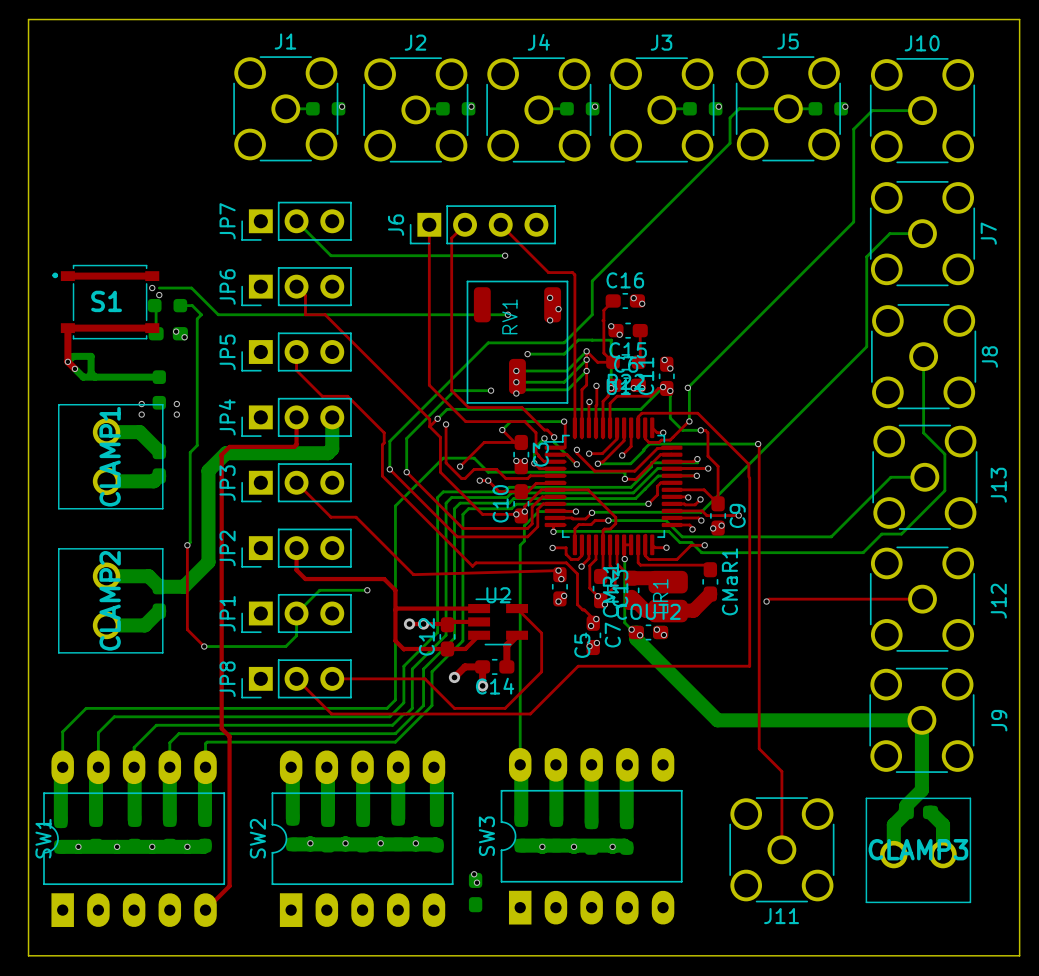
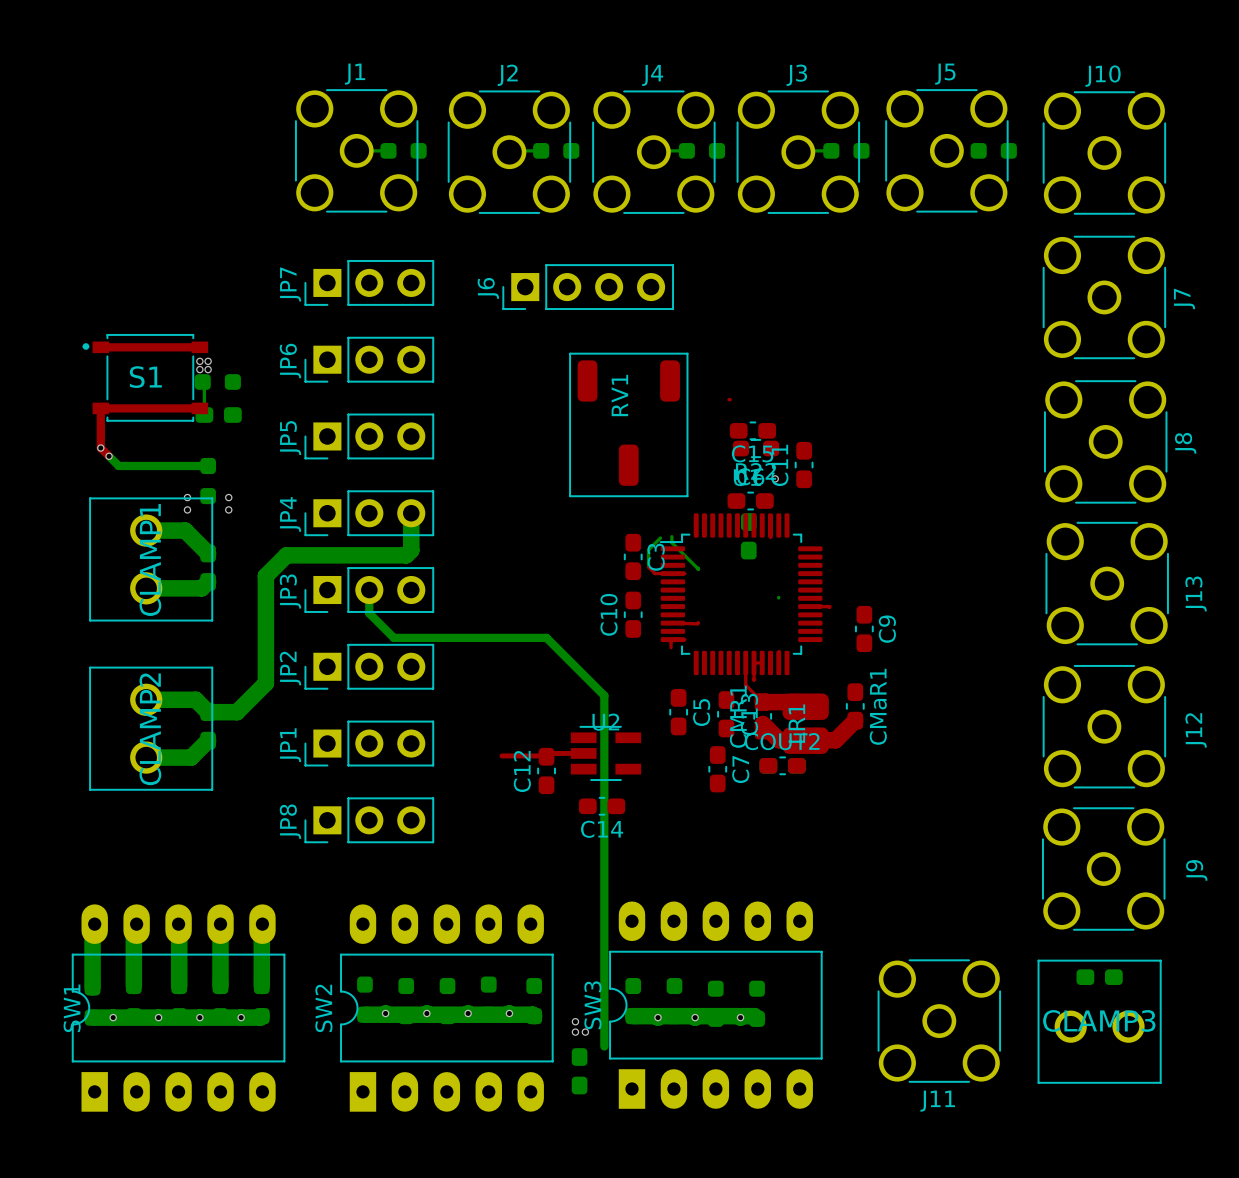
board edge: (28, 19) (1019, 19) (1019, 955) (28, 955) (28, 19) -> none
via: (342, 106) -> none
via: (471, 106) -> none
via: (595, 106) -> none
via: (718, 106) -> none
via: (845, 106) -> none
bottom track: (815, 108) (739, 108) (730, 117) (730, 143) (592, 281) (592, 314) (564, 342) (488, 342) (389, 441) (389, 469) -> none
bottom track: (922, 110) (872, 110) (853, 129) (853, 221) (687, 387) (689, 421) -> none
bottom track: (296, 221) (330, 255) (505, 255) -> none
top track: (429, 224) (429, 385) (465, 421) (524, 421) (536, 432) (536, 452) (544, 461) (565, 461) -> none
top track: (465, 224) (451, 238) (451, 390) (468, 407) (521, 407) (554, 436) -> none
top track: (500, 224) (548, 272) (572, 272) (574, 274) (574, 438) -> none
bottom track: (922, 233) (889, 233) (866, 256) (866, 346) (701, 512) (591, 512) -> none
via: (505, 255) -> none
top track: (296, 286) (305, 295) (305, 314) (325, 314) (429, 419) (429, 426) -> none
bottom track: (159, 288) (191, 288) (218, 314) (507, 314) -> none
via: none -> (208, 361)
via: none -> (199, 369)
via: (550, 297) -> none
via: (633, 298) -> none
top track: (613, 300) (603, 310) (603, 353) (613, 362) (597, 362) (586, 351) (586, 385) (581, 389) (581, 438) -> none
C16 side: top (625, 300) -> bottom (748, 536)
via: (642, 303) -> none
bottom track: (180, 305) (192, 305) (201, 314) (197, 318) (197, 445) (190, 452) (190, 542) (187, 545) -> none
via: (558, 309) -> none
via: (507, 314) -> none
via: (550, 320) -> none
via: (611, 326) -> none
C15 position: (628, 330) -> (752, 430)
top track: (640, 330) (640, 360) (638, 362) -> none
via: (176, 331) -> none
via: (619, 334) -> none
via: (184, 337) -> none
bottom track: (592, 340) (578, 340) (564, 354) (527, 354) -> none
bottom track: (592, 340) (611, 340) (611, 388) -> none
bottom track: (586, 351) (566, 370) (516, 370) (516, 393) (520, 389) (567, 389) (586, 370) -> none
via: (586, 351) -> none
top track: (296, 352) (296, 370) (322, 396) (347, 396) (384, 432) (382, 476) (472, 566) (476, 562) (566, 562) (577, 573) (577, 604) (593, 618) -> none
via: (527, 354) -> none
bottom track: (923, 356) (923, 432) (944, 454) (944, 490) (901, 534) (881, 534) (863, 552) (701, 552) (691, 542) (679, 542) (668, 531) (554, 531) -> none
bottom track: (586, 359) (564, 382) (516, 382) -> none
via: (586, 359) -> none
via: (664, 360) -> none
bottom track: (67, 361) (73, 356) (91, 356) (91, 373) (95, 377) -> none
via: (670, 368) -> none
via: (516, 370) -> none
via: (586, 370) -> none
via: (516, 382) -> none
top track: (596, 385) (595, 438) -> none
via: (596, 385) -> none
C6 position: (626, 385) -> (750, 501)
top track: (663, 387) (658, 388) (650, 396) (617, 396) (610, 403) (610, 438) -> none
bottom track: (663, 387) (640, 409) (447, 409) (437, 418) -> none
via: (663, 387) -> none
via: (687, 387) -> none
via: (611, 388) -> none
via: (633, 388) -> none
bottom track: (491, 390) (454, 390) (406, 438) (406, 472) -> none
via: (491, 390) -> none
top track: (614, 390) (611, 388) (607, 396) (603, 401) (603, 438) -> none
bottom track: (670, 390) (670, 418) (682, 430) (700, 430) -> none
via: (670, 390) -> none
via: (516, 393) -> none
via: (589, 401) -> none
top track: (588, 402) (588, 427) -> none
top track: (296, 417) (296, 444) (294, 446) (229, 446) (221, 455) (221, 728) (229, 736) (229, 886) (205, 910) -> none
top track: (437, 418) (429, 426) -> none
via: (437, 418) -> none
top track: (564, 421) (565, 447) -> none
bottom track: (564, 421) (510, 421) (502, 430) -> none
via: (564, 421) -> none
via: (689, 421) -> none
top track: (688, 422) (670, 440) (661, 440) (659, 442) (649, 442) (645, 438) (645, 427) -> none
top track: (446, 424) (446, 462) (461, 478) (465, 478) (474, 469) (496, 469) (505, 478) (527, 478) (530, 475) (565, 475) -> none
via: (446, 424) -> none
top track: (429, 426) (440, 437) (440, 472) (482, 514) (516, 514) -> none
top track: (617, 427) (617, 438) (602, 453) (589, 453) -> none
top track: (624, 427) (624, 440) (602, 462) (597, 463) -> none
top track: (631, 427) (631, 446) (622, 455) -> none
top track: (638, 427) (638, 417) (641, 413) (697, 413) (748, 464) (748, 476) -> none
top track: (652, 427) (657, 432) (663, 432) -> none
top track: (502, 430) (514, 442) -> none
via: (502, 430) -> none
top track: (700, 430) (705, 430) (707, 432) (707, 456) (718, 466) (718, 503) (704, 489) (672, 489) -> none
via: (700, 430) -> none
via: (663, 432) -> none
via: (554, 437) -> none
via: (544, 438) -> none
top track: (521, 442) (484, 442) (460, 466) -> none
top track: (758, 444) (759, 748) (781, 771) (781, 849) -> none
bottom track: (758, 444) (649, 444) (630, 463) (597, 463) -> none
via: (758, 444) -> none
top track: (672, 447) (657, 448) (634, 471) (594, 471) (576, 453) (576, 449) -> none
via: (576, 449) -> none
via: (589, 453) -> none
top track: (553, 454) (567, 454) (576, 464) -> none
top track: (671, 454) (660, 454) (635, 479) (624, 479) -> none
via: (622, 455) -> none
top track: (696, 458) (693, 461) (672, 461) -> none
bottom track: (697, 459) (697, 462) (651, 462) (651, 466) (630, 487) (509, 487) (504, 491) (443, 491) (437, 497) (437, 632) (403, 666) (403, 702) (389, 716) (114, 716) (98, 732) (98, 767) -> none
via: (697, 459) -> none
via: (516, 460) -> none
via: (524, 460) -> none
via: (534, 463) -> none
via: (597, 463) -> none
via: (576, 464) -> none
via: (460, 466) -> none
bottom track: (707, 468) (657, 468) (633, 492) (511, 492) (506, 497) (451, 497) (446, 503) (446, 635) (412, 669) (412, 708) (406, 714) (403, 714) (392, 725) (156, 725) (134, 747) (134, 767) -> none
top track: (708, 468) (672, 468) -> none
via: (708, 468) -> none
top track: (389, 469) (457, 536) (527, 536) (537, 526) (537, 509) (543, 503) (565, 503) -> none
via: (389, 469) -> none
top track: (406, 472) (462, 528) (527, 528) (532, 523) (532, 506) (542, 496) (565, 496) -> none
via: (406, 472) -> none
top track: (672, 475) (696, 475) -> none
bottom track: (696, 475) (658, 476) (635, 498) (513, 498) (509, 503) (460, 503) (454, 508) (454, 638) (423, 669) (423, 705) (395, 733) (178, 733) (169, 742) (169, 767) -> none
via: (696, 475) -> none
top track: (749, 477) (749, 666) (578, 666) (530, 714) (331, 714) (296, 678) -> none
bottom track: (924, 477) (890, 477) (831, 536) (682, 536) (665, 520) (608, 520) -> none
via: (624, 478) -> none
bottom track: (625, 478) (625, 472) (488, 472) (474, 458) (443, 458) (395, 505) (395, 699) (387, 708) (86, 708) (62, 731) (62, 767) -> none
top track: (479, 480) (488, 480) (499, 491) (527, 491) (536, 483) (565, 482) -> none
via: (479, 480) -> none
via: (488, 480) -> none
top track: (296, 482) (330, 517) (356, 517) (413, 574) (558, 570) (559, 574) -> none
top track: (672, 482) (660, 482) (657, 486) (657, 494) (648, 503) -> none
bottom track: none -> (369, 590) (369, 613) (393, 637) (546, 637) (604, 695) (604, 1046)
via: (688, 497) -> none
top track: (701, 498) (695, 504) (672, 503) -> none
via: (700, 499) -> none
via: (648, 503) -> none
bottom track: (648, 504) (516, 504) (511, 508) (468, 508) (462, 514) (462, 640) (432, 671) (432, 705) (395, 742) (207, 742) (205, 767) -> none
top track: (672, 510) (702, 510) (706, 515) (738, 515) -> none
top track: (524, 511) (524, 506) (541, 489) (588, 489) (615, 517) (615, 523) (610, 529) (603, 530) (601, 572) -> none
via: (524, 511) -> none
bottom track: (575, 511) (538, 511) (524, 525) (524, 541) (520, 545) (521, 819) -> none
via: (575, 511) -> none
top track: (591, 512) (585, 518) (555, 517) -> none
via: (591, 512) -> none
via: (516, 514) -> none
via: (738, 515) -> none
top track: (672, 517) (698, 517) (701, 520) -> none
top track: (608, 520) (595, 520) (591, 524) (578, 524) (574, 528) (574, 544) -> none
via: (608, 520) -> none
via: (701, 520) -> none
top track: (672, 524) (689, 524) (694, 529) -> none
via: (721, 525) -> none
via: (713, 528) -> none
via: (692, 529) -> none
via: (553, 531) -> none
top track: (581, 544) (581, 555) (578, 559) (571, 559) (566, 554) (566, 547) (552, 547) -> none
top track: (588, 544) (588, 558) (582, 565) -> none
top track: (595, 544) (595, 559) (589, 565) (589, 588) (597, 596) -> none
top track: (610, 544) (610, 565) (615, 571) (615, 586) (600, 600) -> none
top track: (638, 544) (638, 562) (640, 565) (705, 565) -> none
top track: (645, 544) (645, 555) (649, 559) (676, 559) (691, 545) (704, 545) -> none
top track: (652, 544) (655, 547) (666, 547) -> none
top track: (187, 545) (187, 629) (204, 646) -> none
via: (187, 545) -> none
via: (704, 545) -> none
via: (552, 547) -> none
via: (666, 547) -> none
top track: (296, 548) (296, 570) (305, 579) (384, 579) (395, 590) (395, 640) (403, 649) (465, 648) (479, 635) -> none
bottom track: (624, 559) (624, 622) (631, 629) -> none
via: (624, 559) -> none
via: (581, 566) -> none
via: (558, 570) -> none
via: (561, 579) -> none
bottom track: (367, 590) (319, 590) (296, 613) (296, 635) (285, 646) (204, 646) -> none
via: (367, 590) -> none
via: (564, 595) -> none
via: (597, 596) -> none
top track: (922, 599) (768, 599) (766, 601) -> none
via: (558, 601) -> none
via: (766, 601) -> none
via: (604, 604) -> none
top track: (479, 608) (395, 609) -> none
top track: (517, 608) (541, 633) (541, 671) (505, 708) (454, 708) (424, 678) (332, 678) -> none
via: (596, 619) -> none
via: (409, 624) -> none
via: (423, 624) -> none
via: (591, 625) -> none
via: (631, 629) -> none
via: (656, 629) -> none
bottom track: (636, 632) (636, 639) (717, 720) (921, 720) (921, 790) (906, 805) (906, 812) (893, 824) (893, 854) -> none
top track: (517, 635) (506, 645) (506, 666) -> none
via: (640, 635) -> none
via: (663, 635) -> none
via: (596, 643) -> none
C5 name position: C5 (582, 645) -> C5 (701, 712)
via: (204, 646) -> none
via: (589, 646) -> none
top track: (454, 677) (465, 666) (482, 666) (482, 685) -> none
via: (454, 677) -> none
via: (482, 685) -> none
bottom track: (555, 764) (556, 819) -> none
bottom track: (591, 764) (591, 822) -> none
bottom track: (627, 764) (626, 822) -> none
bottom track: (291, 767) (292, 768) (292, 818) -> none
bottom track: (326, 767) (327, 819) -> none
bottom track: (362, 767) (363, 819) -> none
bottom track: (398, 767) (398, 818) -> none
bottom track: (433, 767) (436, 770) (436, 819) -> none
bottom track: (930, 812) (943, 824) (943, 854) -> none
via: none -> (575, 1021)
via: none -> (575, 1032)
via: none -> (585, 1032)
via: (474, 874) -> none
via: (476, 882) -> none

